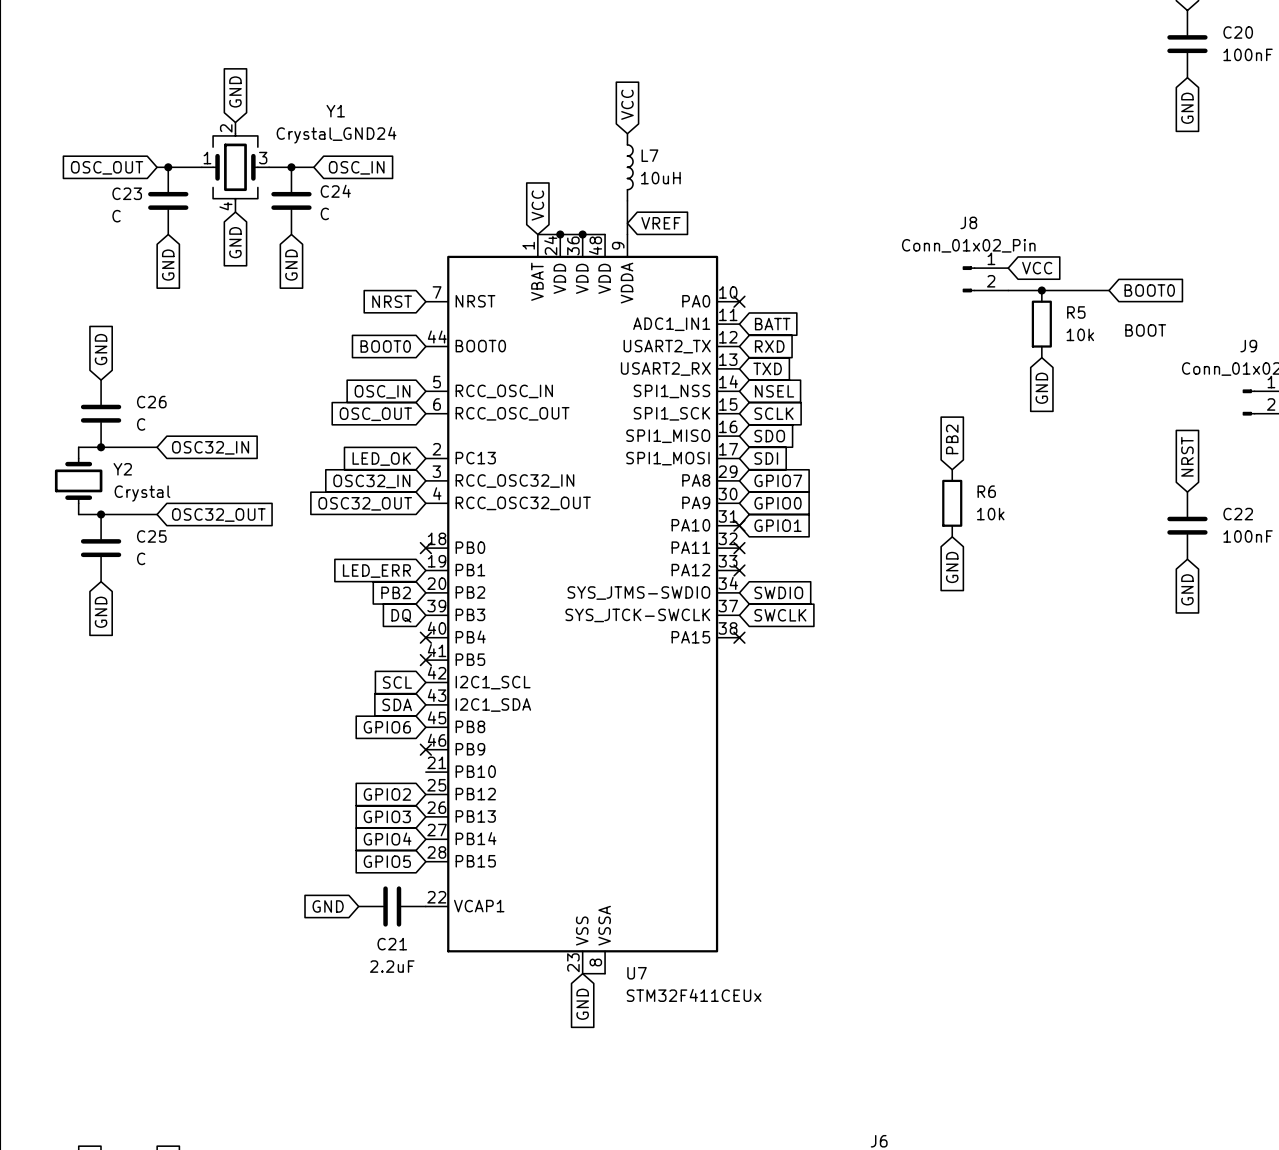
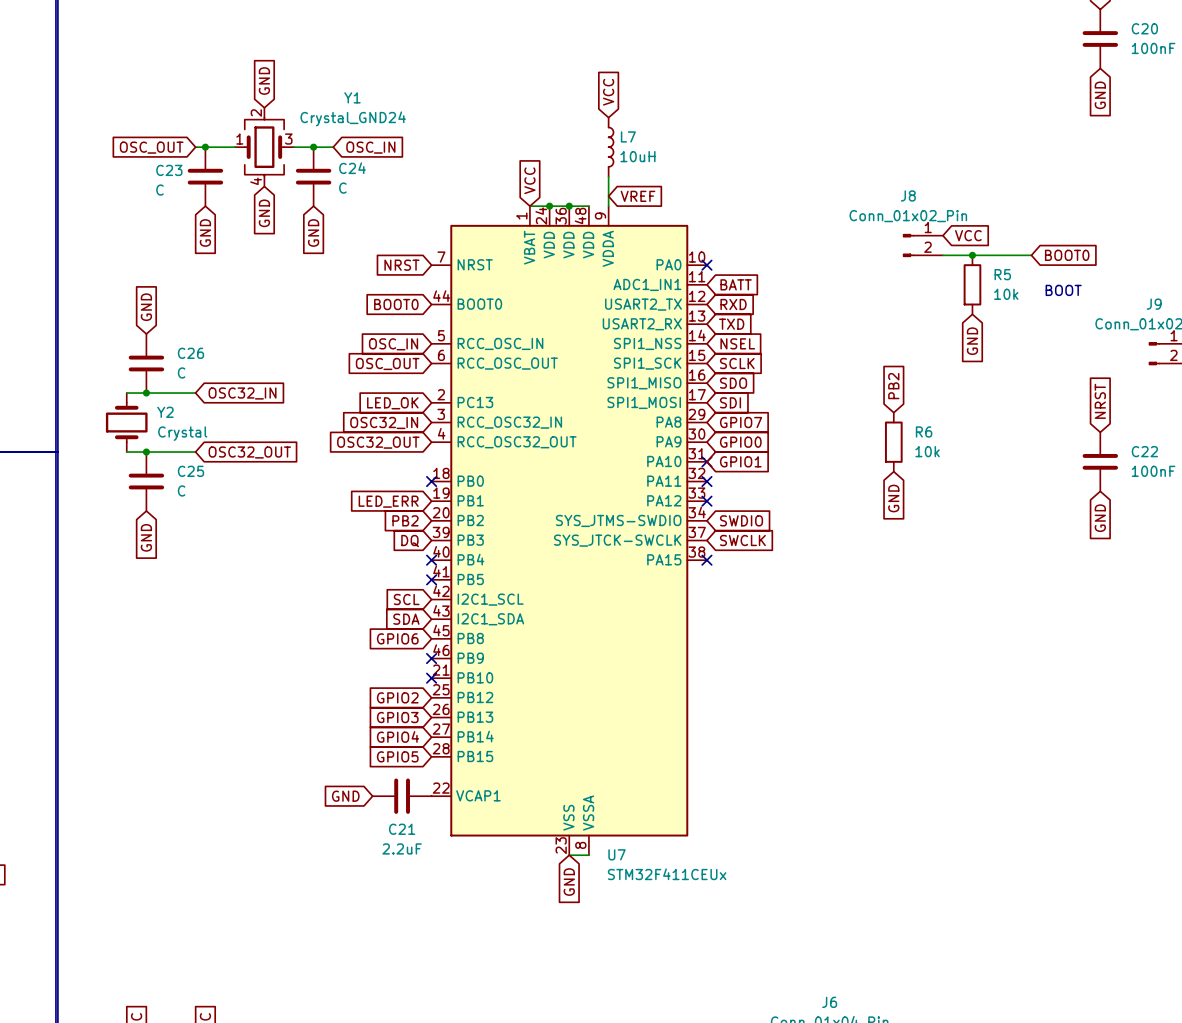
no-connect mark: none -> (431, 678)

